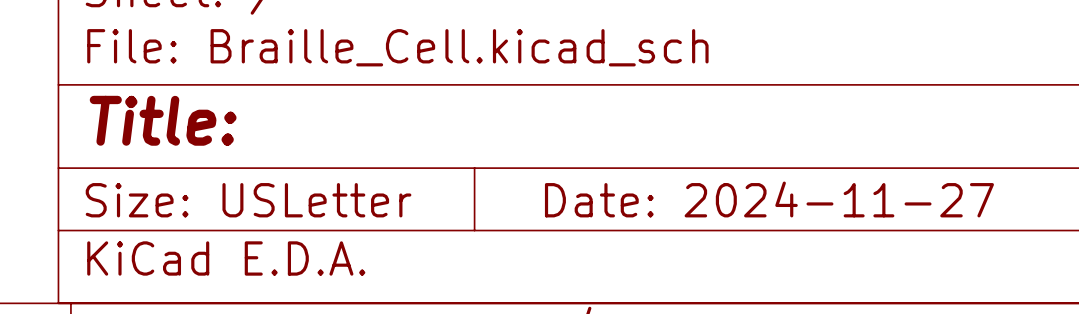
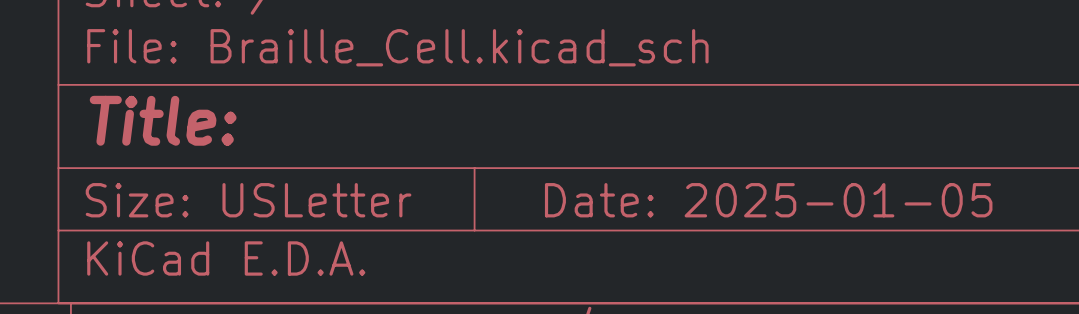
title block: Date: 2024-11-27 (769, 199) -> Date: 2025-01-05 (768, 200)

